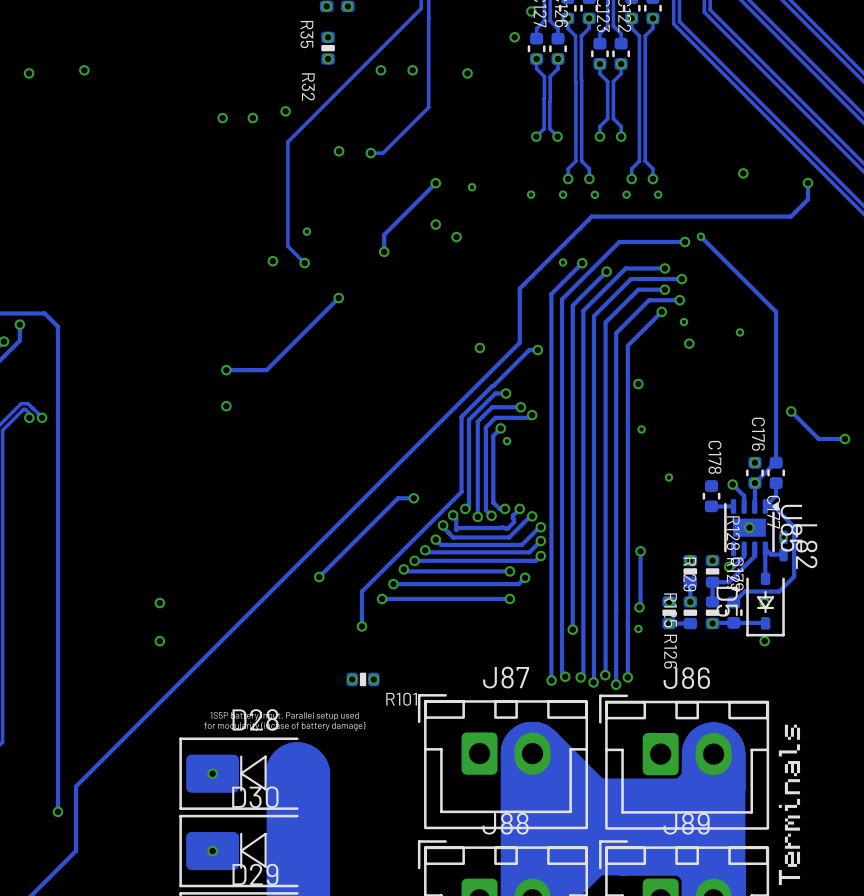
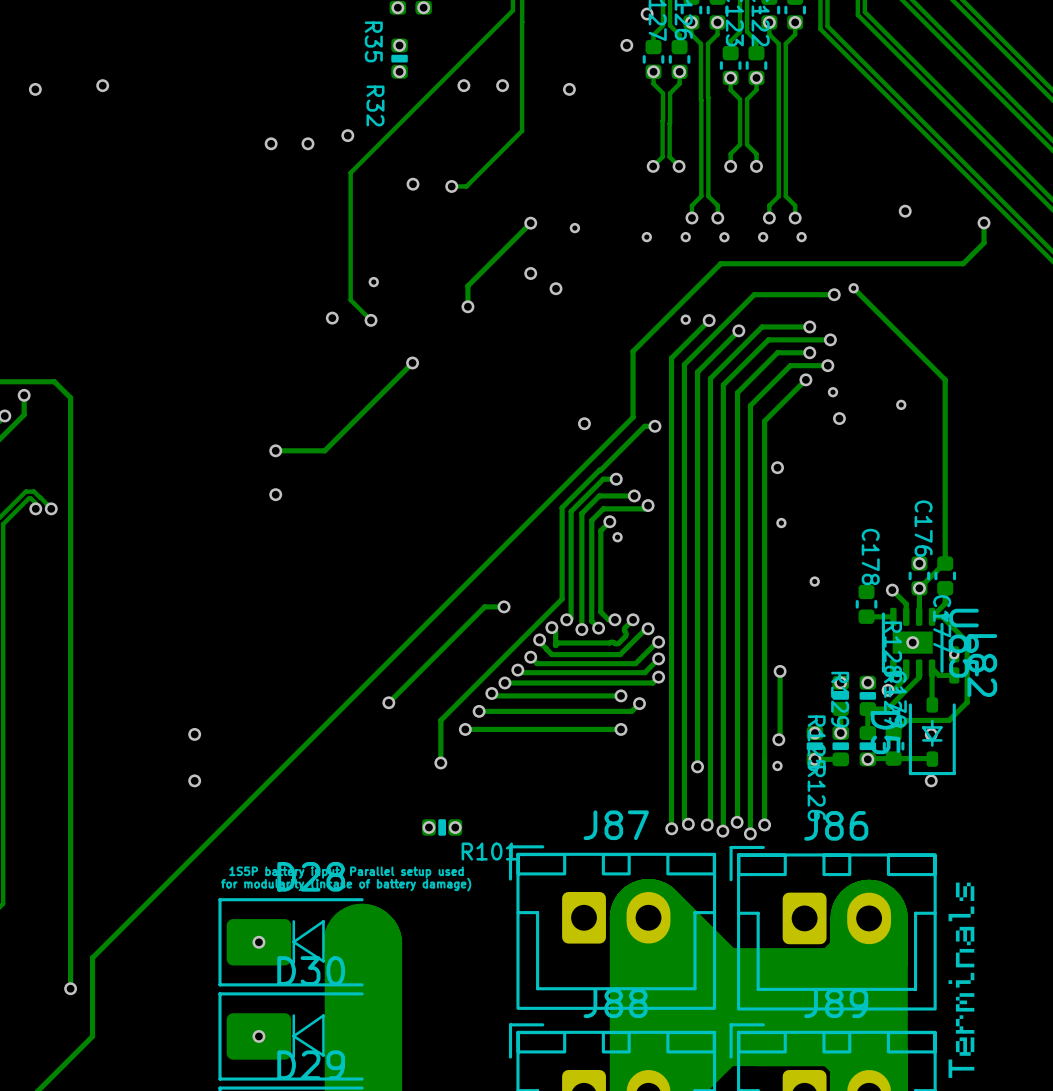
track: (791, 411) (818, 439) (844, 439) -> none
via: (791, 411) -> none
via: (844, 439) -> none

